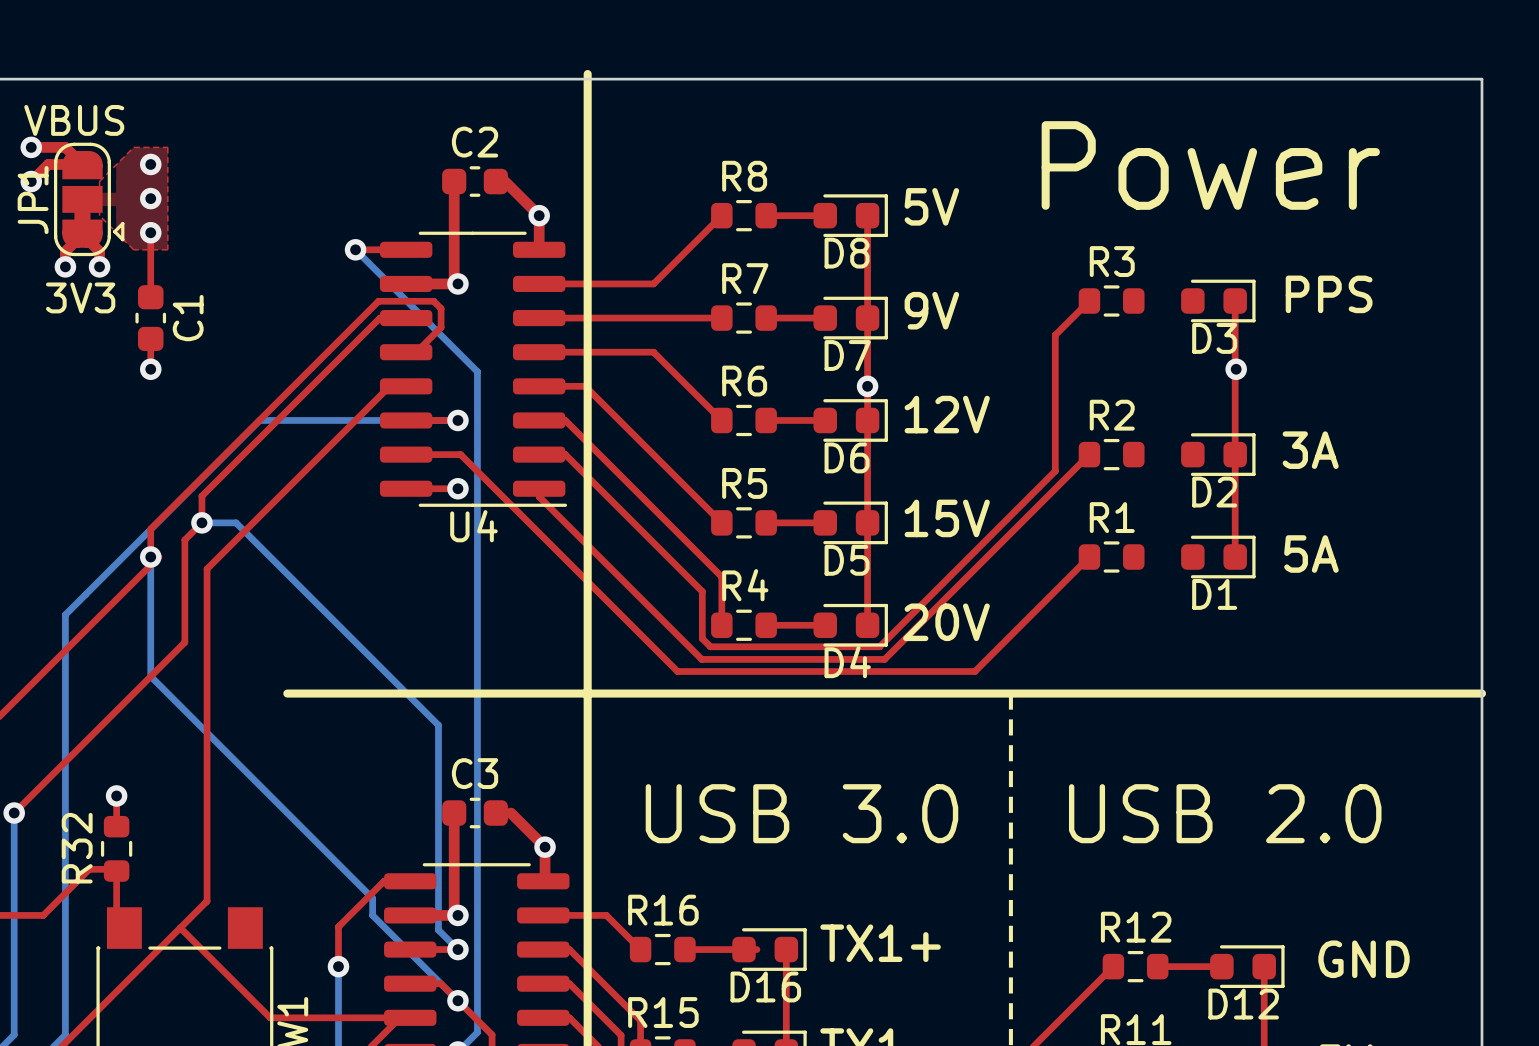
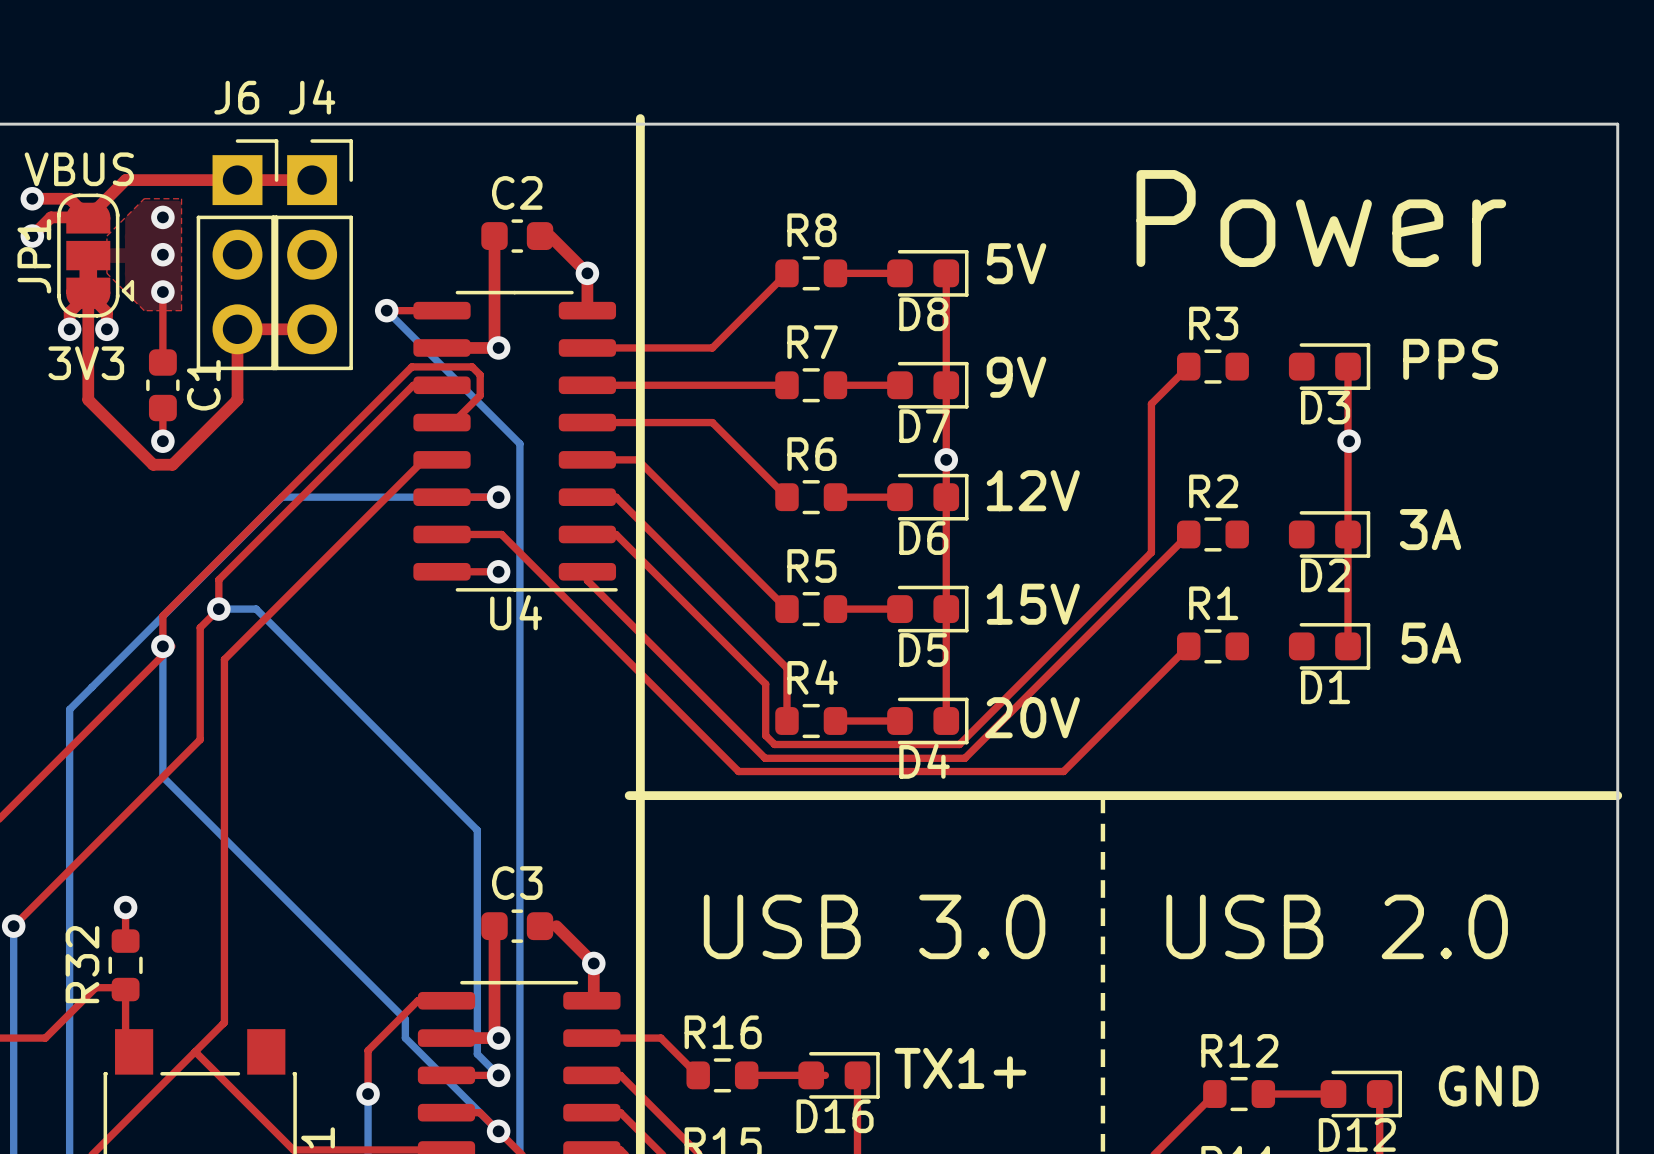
top track: none -> (312, 180) (125, 180) (88, 217)
J6: none -> (237, 254)
J4: none -> (312, 254)
top track: none -> (88, 293) (88, 399) (153, 464) (172, 464) (237, 399) (237, 329) (312, 329)
line: (287, 693) (577, 693) -> none

